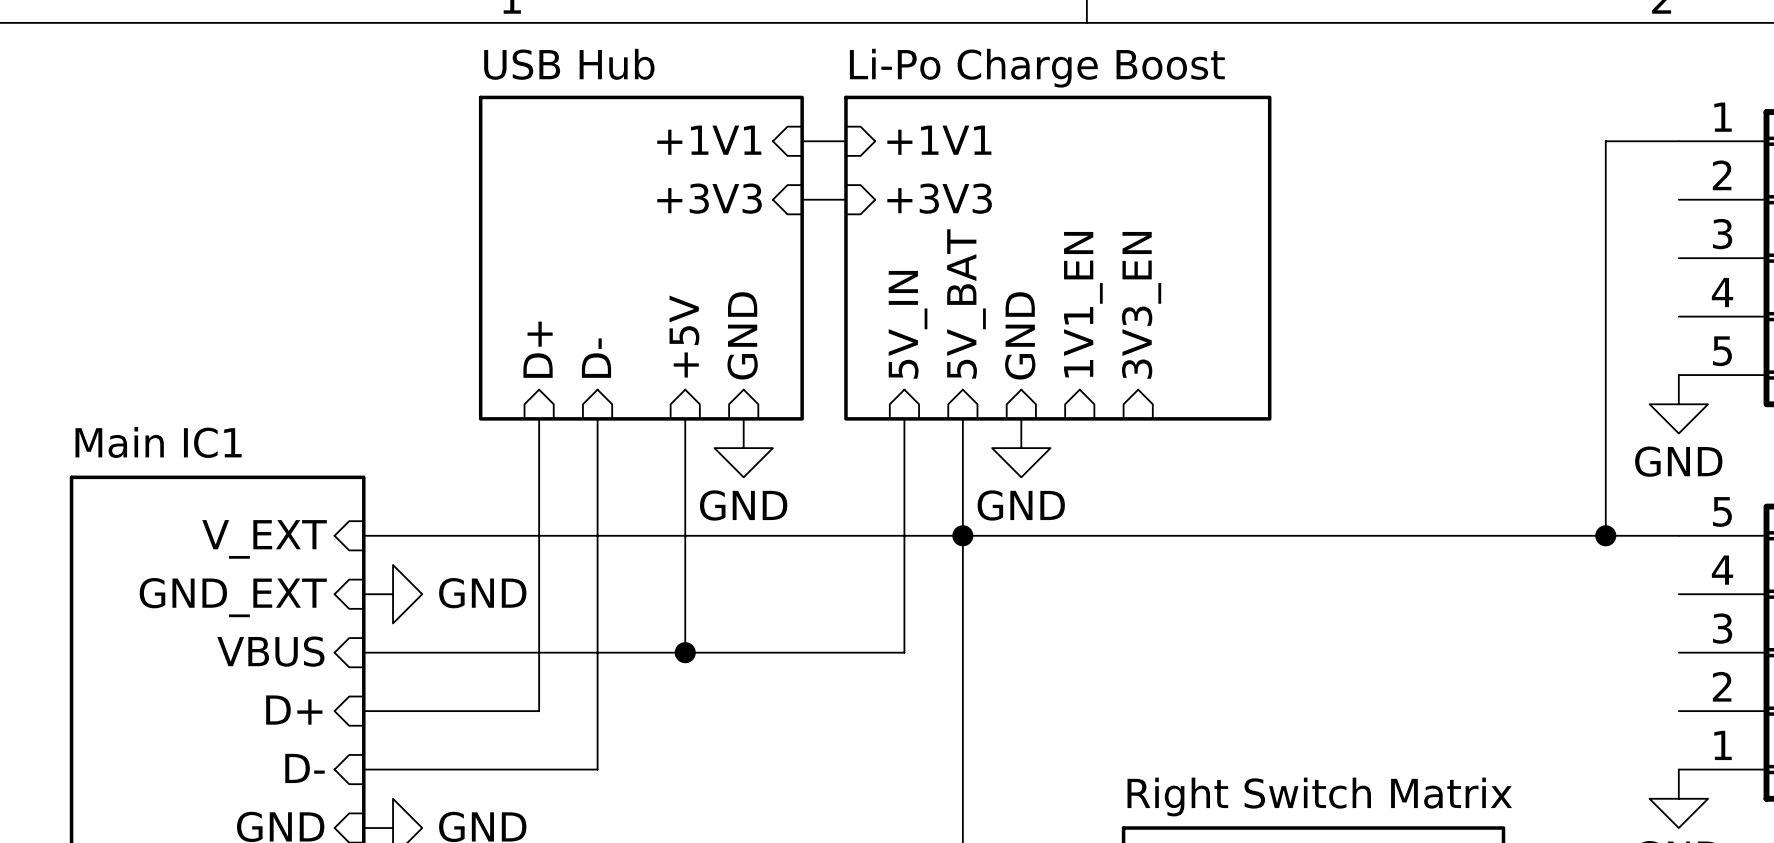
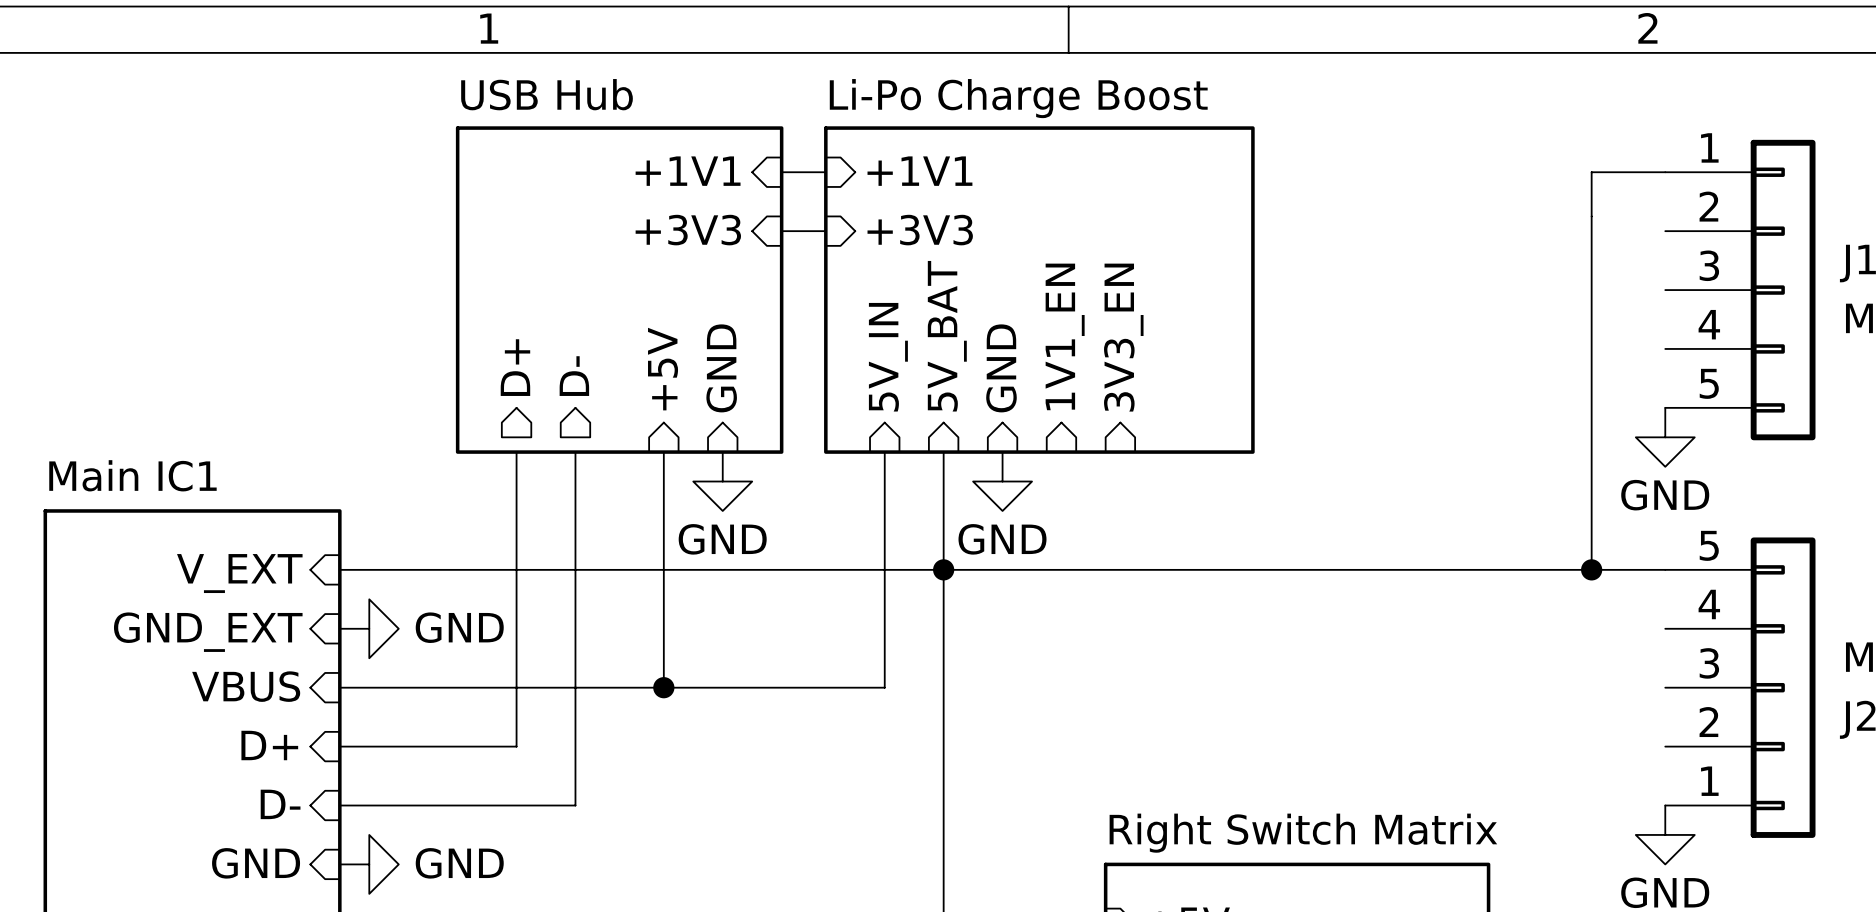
sheet pin position: D+ (538, 349) -> D+ (515, 367)
sheet pin position: D- (596, 358) -> D- (574, 376)

